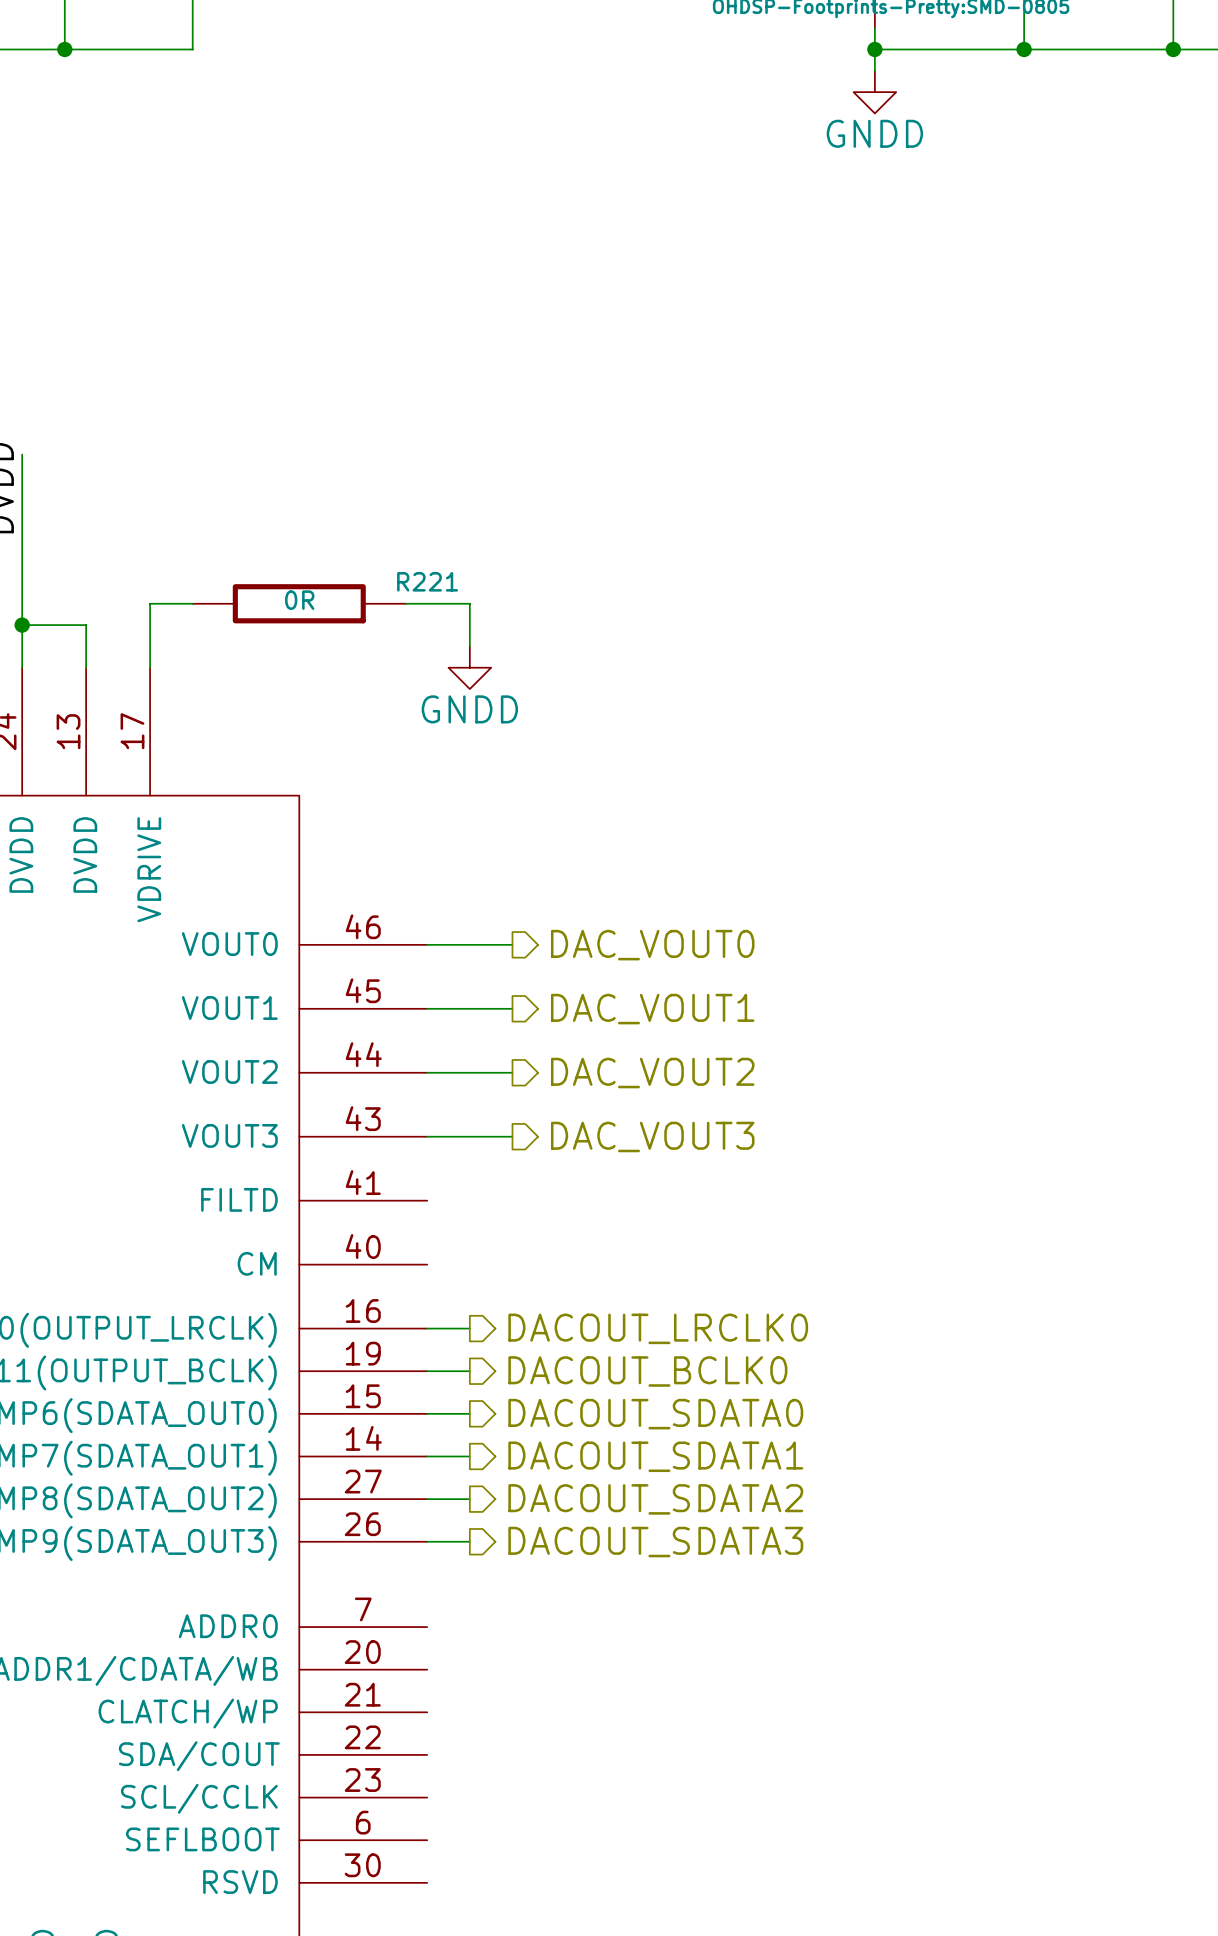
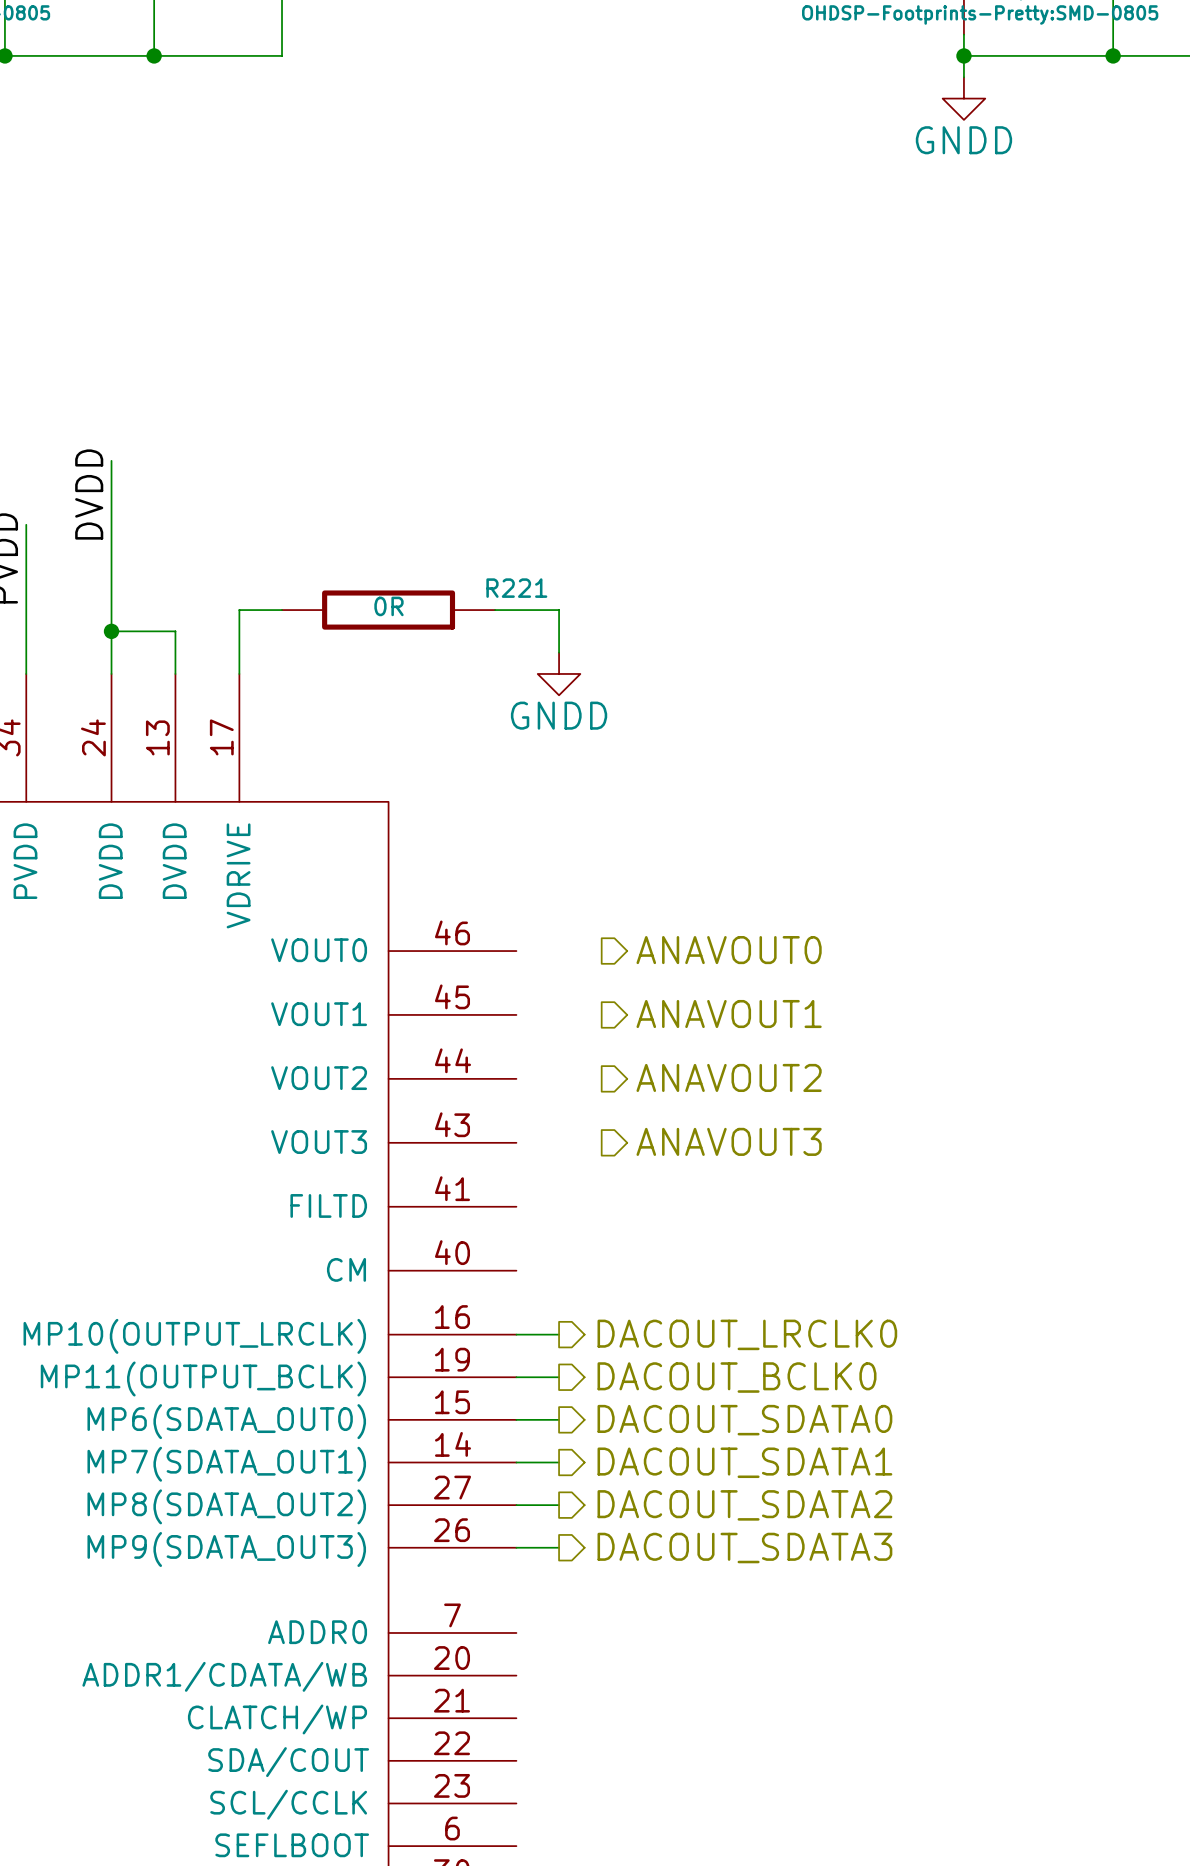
wire: (427, 944) (512, 944) -> none
hierarchical label: DAC_VOUT0 (652, 945) -> ANAVOUT0 (729, 950)
wire: (427, 1008) (512, 1008) -> none
hierarchical label: DAC_VOUT1 (652, 1009) -> ANAVOUT1 (729, 1014)
wire: (427, 1072) (512, 1072) -> none
hierarchical label: DAC_VOUT2 (652, 1073) -> ANAVOUT2 (729, 1077)
wire: (427, 1136) (512, 1136) -> none
hierarchical label: DAC_VOUT3 (652, 1136) -> ANAVOUT3 (729, 1141)

